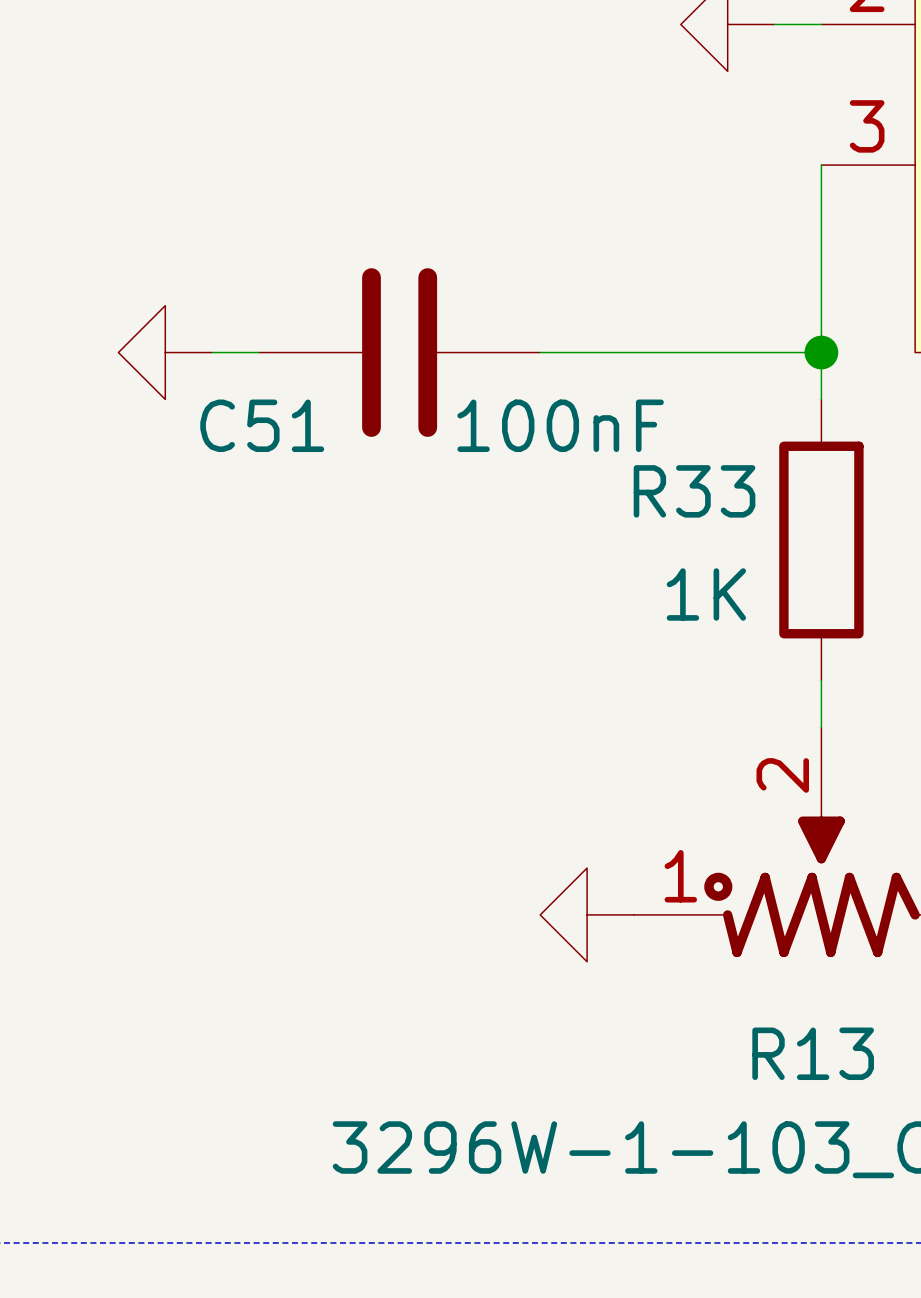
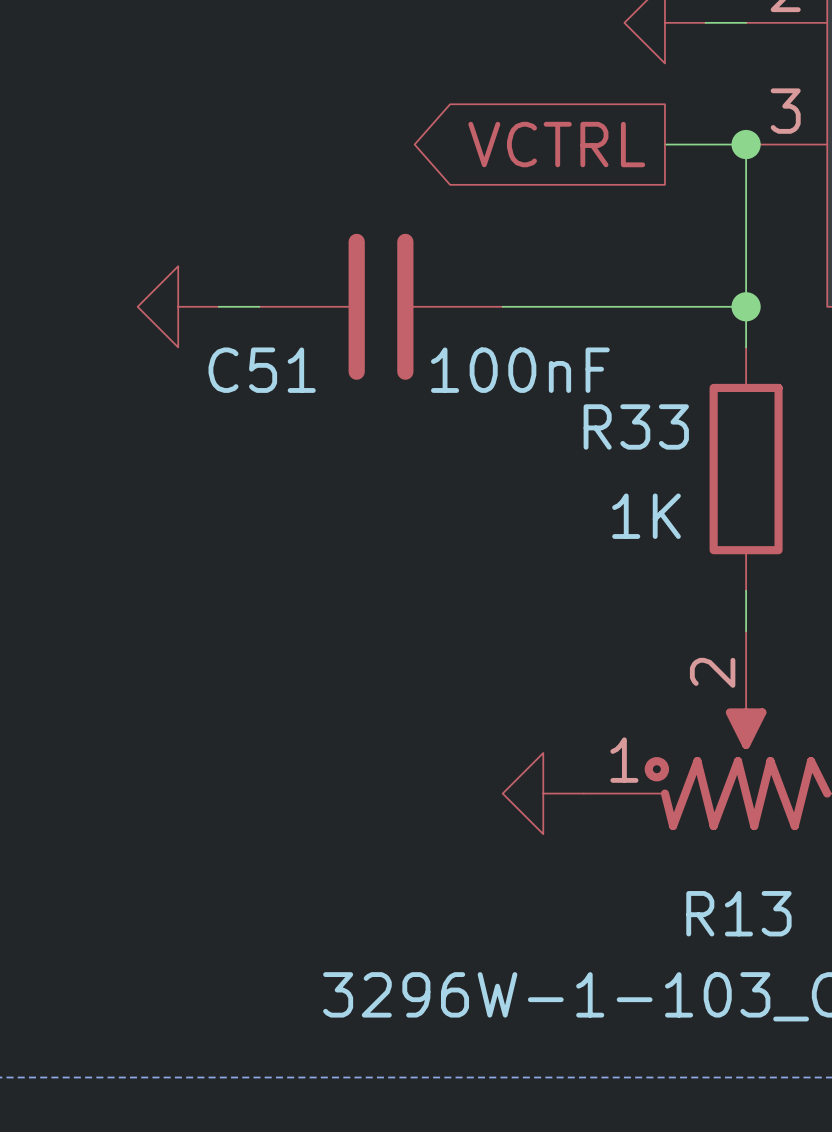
global label: none -> VCTRL (556, 144)
wire: none -> (664, 144) (746, 144)
junction: none -> (746, 144)

